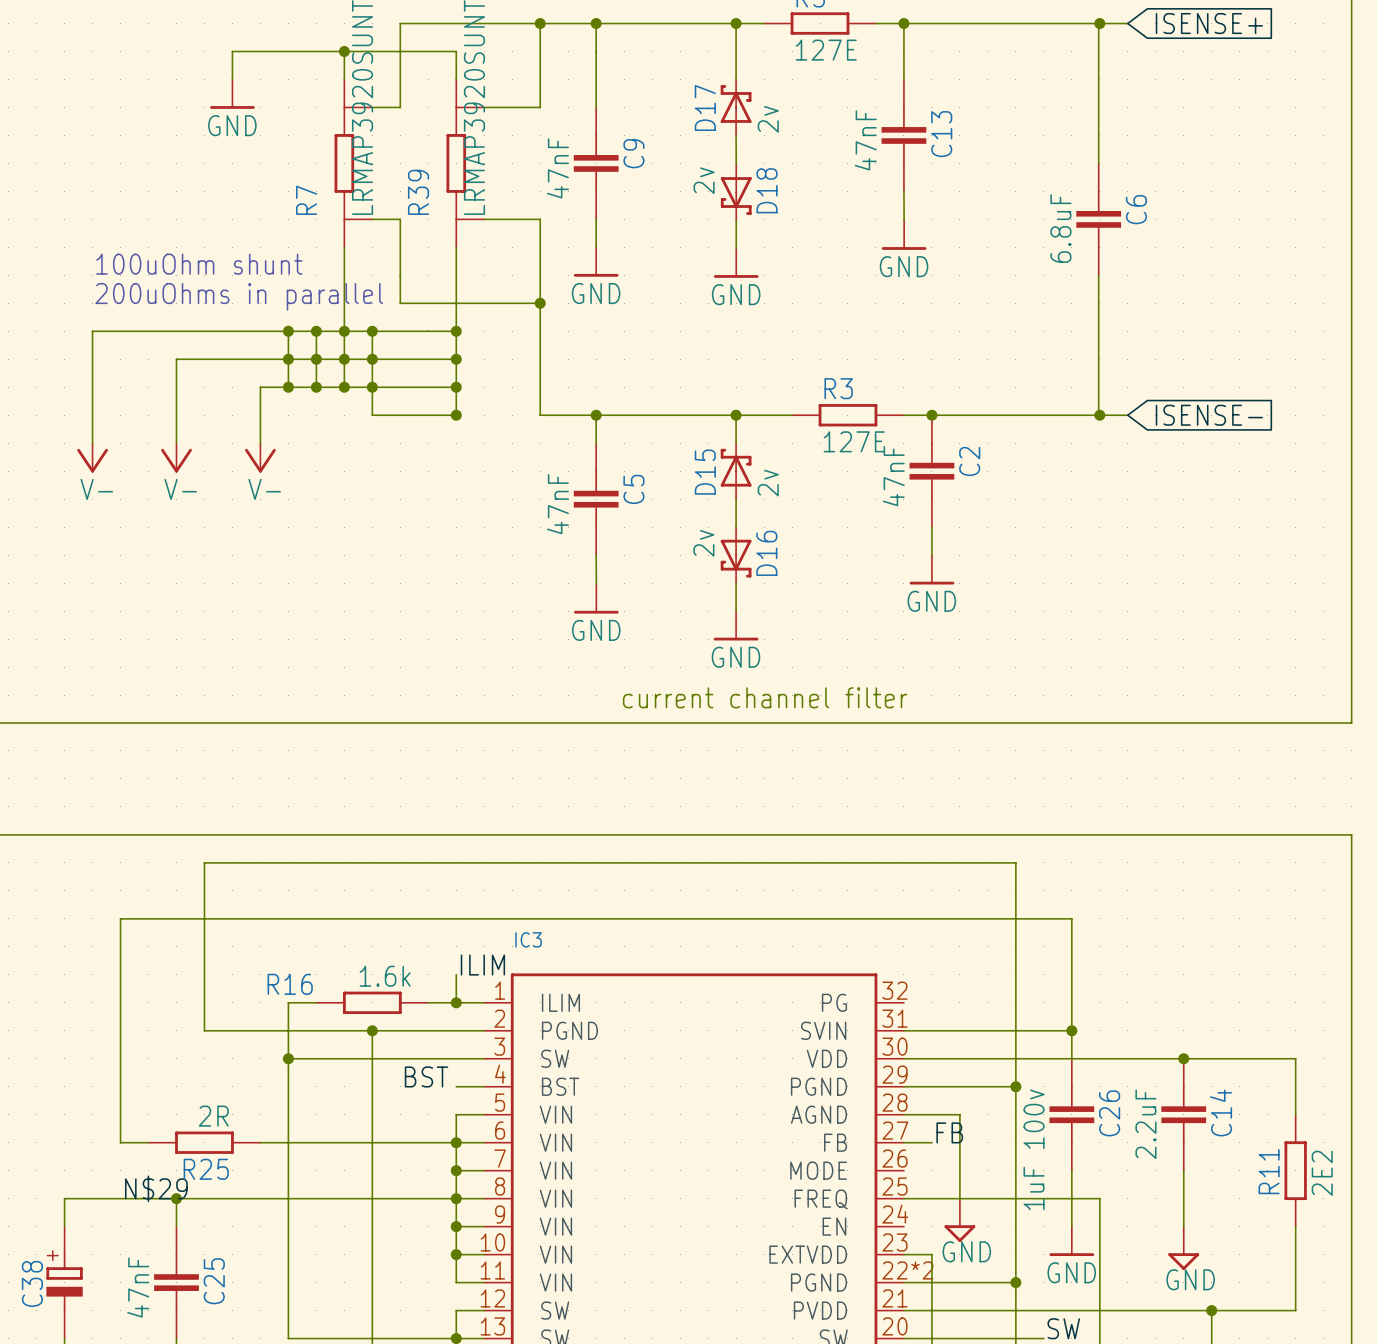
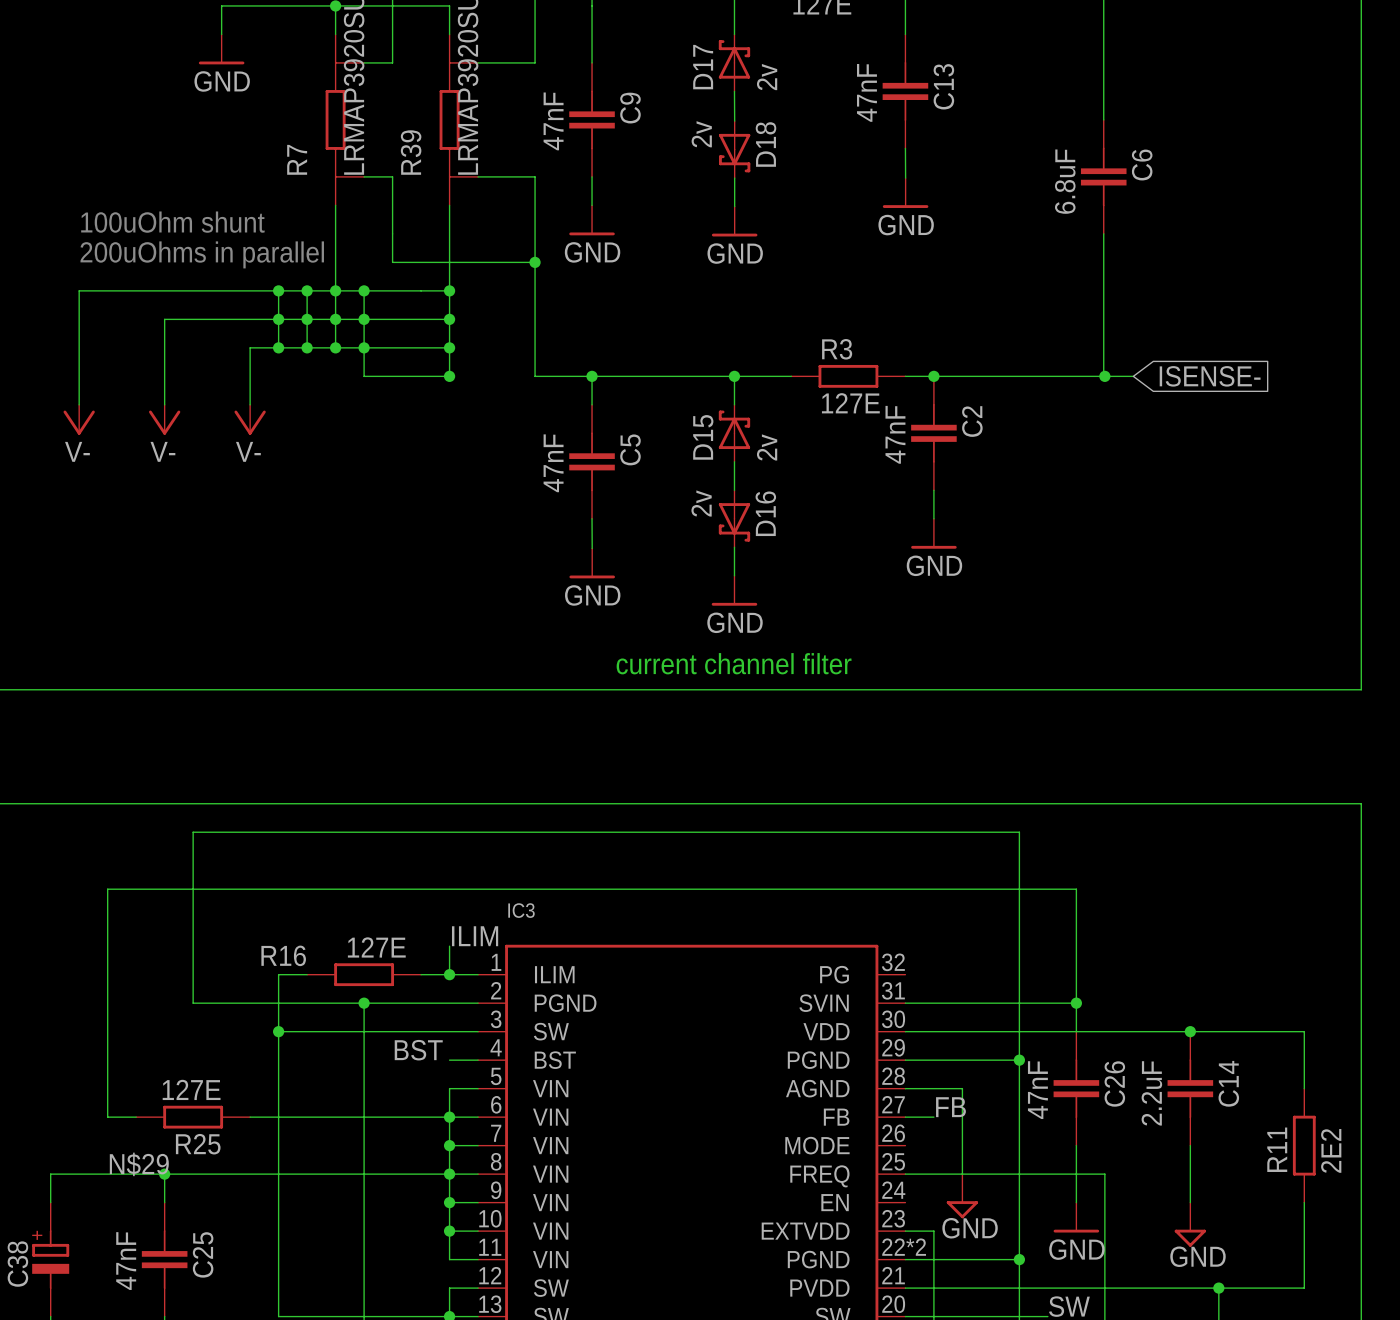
R16 value: 1.6k (385, 976) -> 127E (376, 947)
R25 value: 2R (213, 1116) -> 127E (191, 1089)
C26 value: 1uF 100v (1034, 1149) -> 47nF (1037, 1090)

